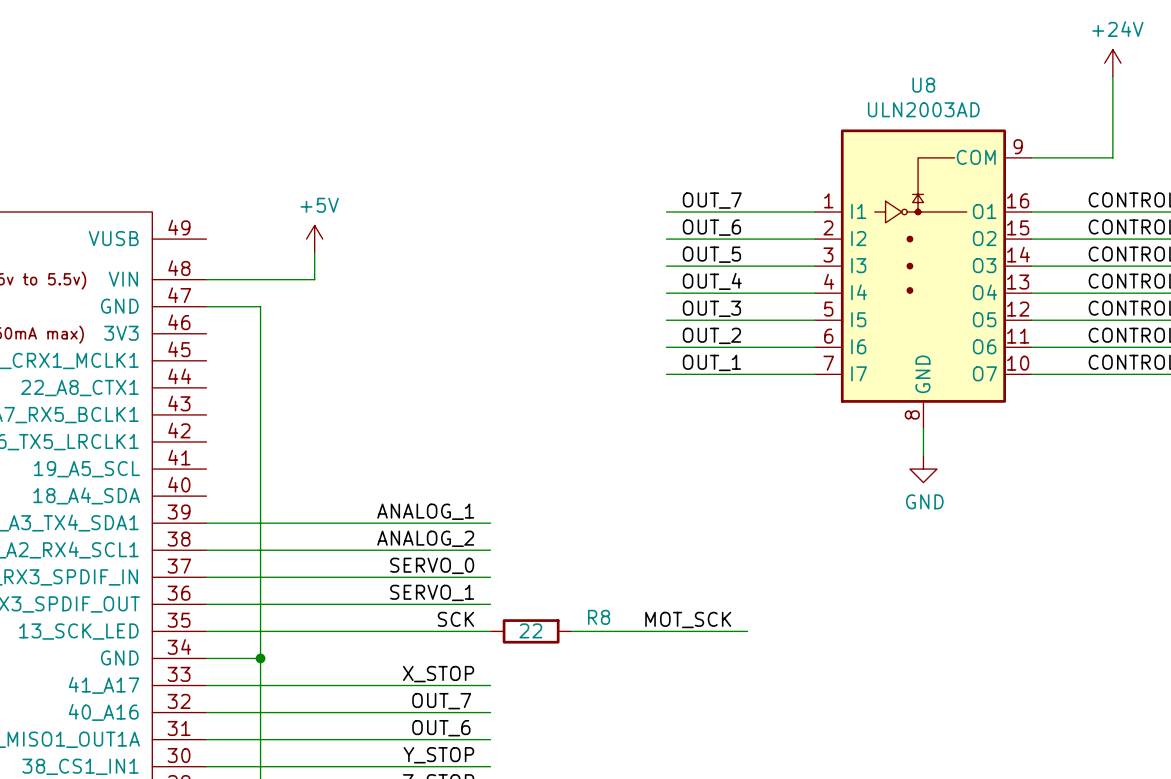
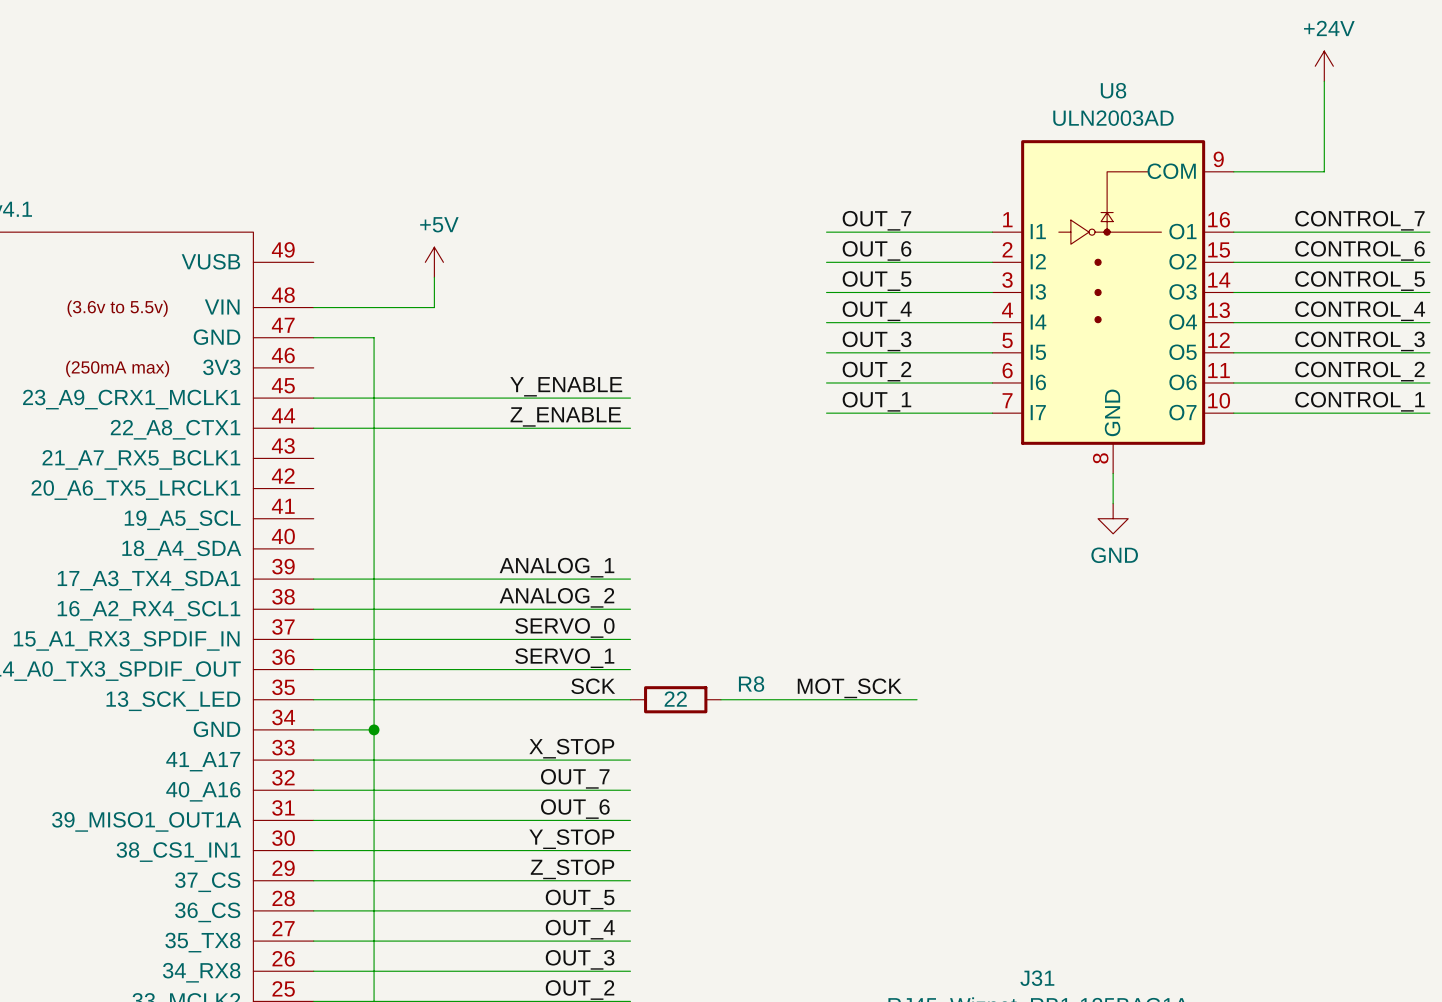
label: none -> Y_ENABLE (566, 386)
wire: none -> (313, 398) (630, 398)
label: none -> Z_ENABLE (565, 416)
wire: none -> (313, 428) (630, 428)

